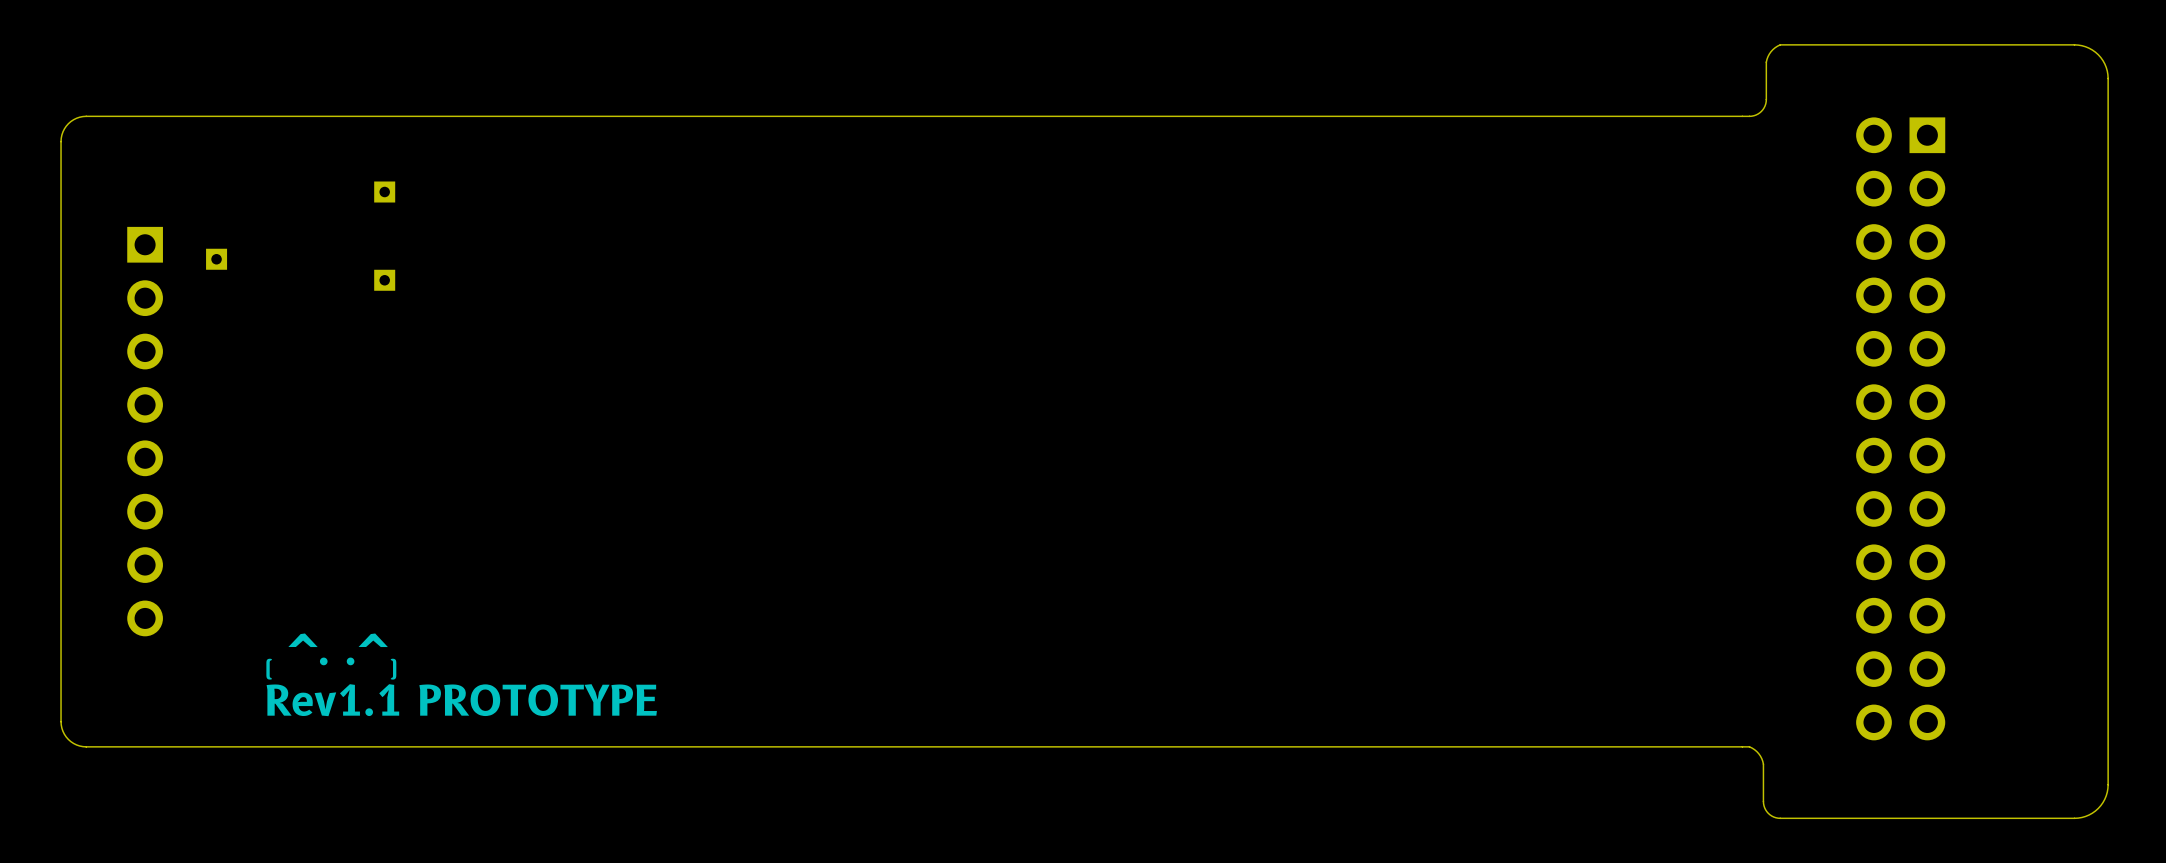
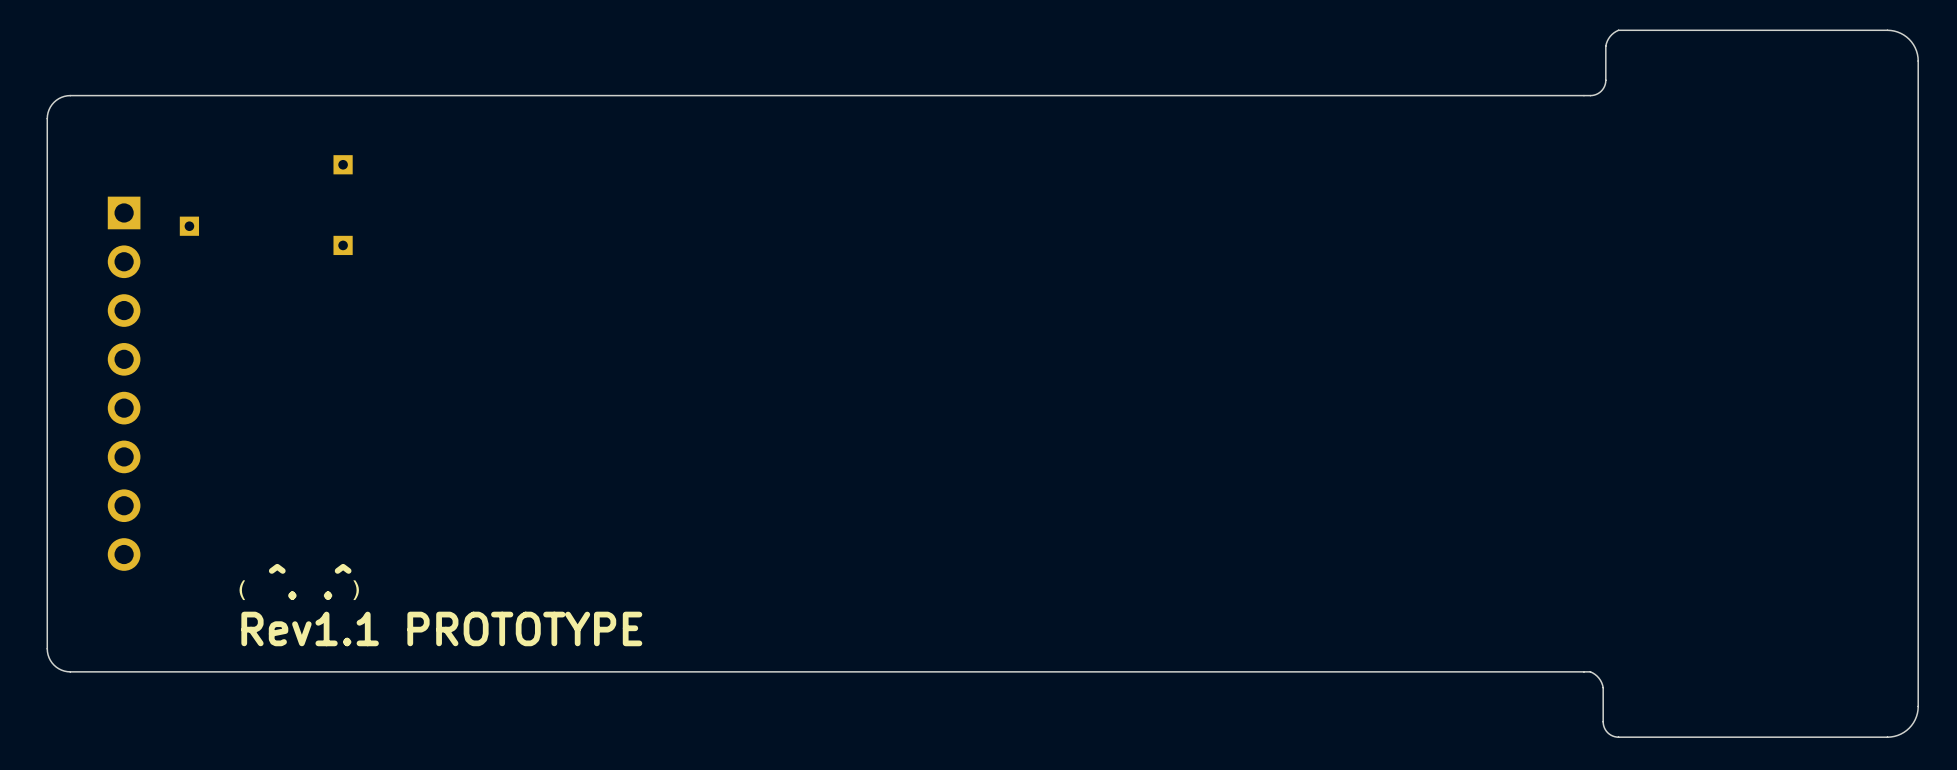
part: (1900, 428) -> none

